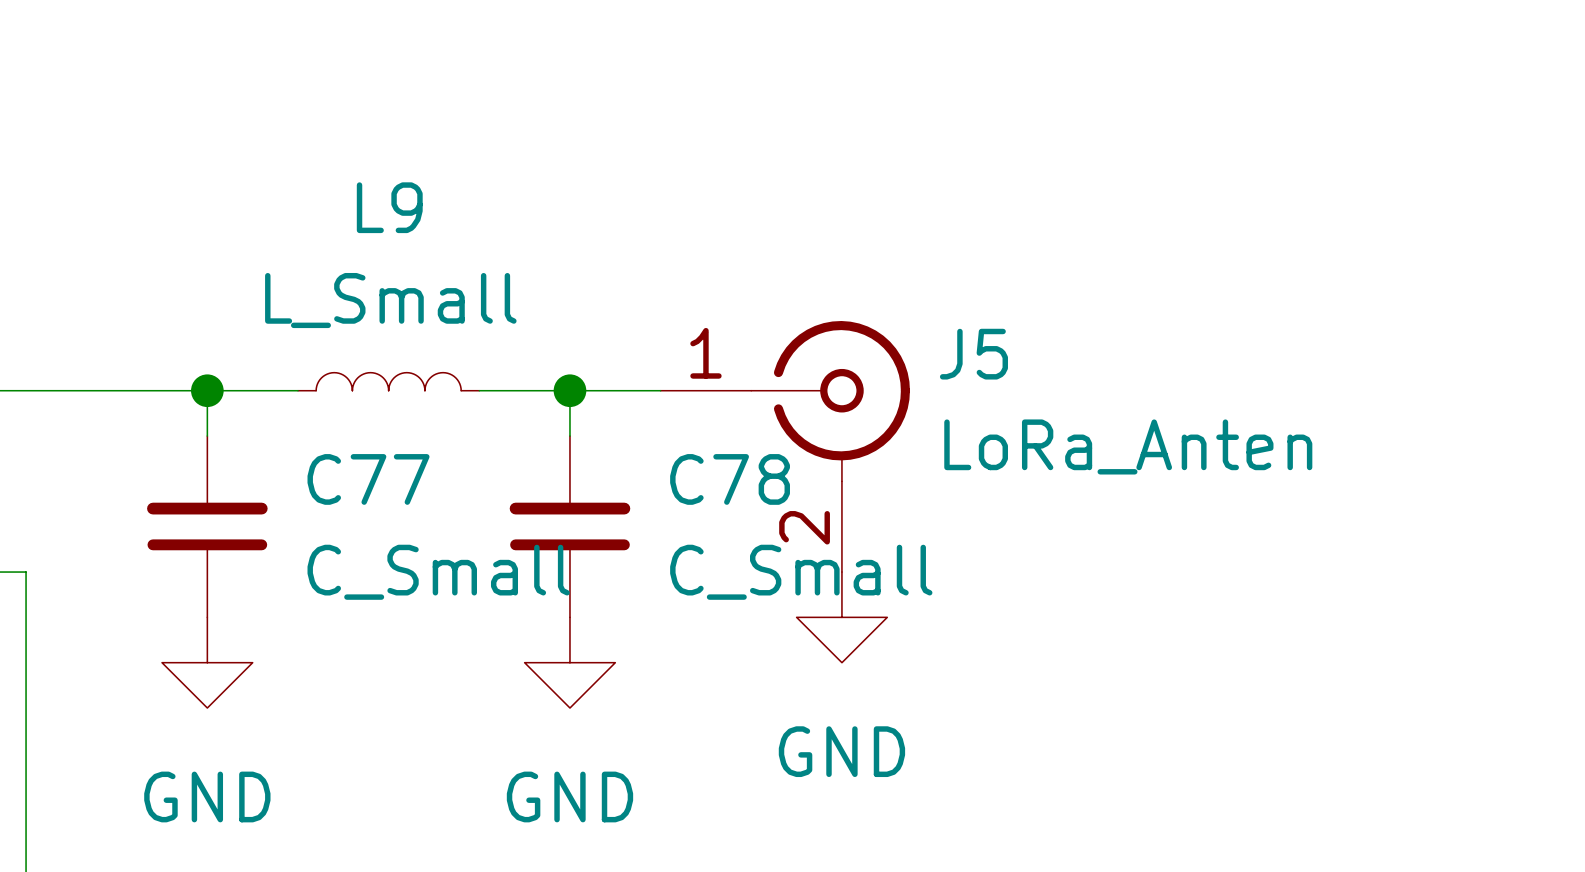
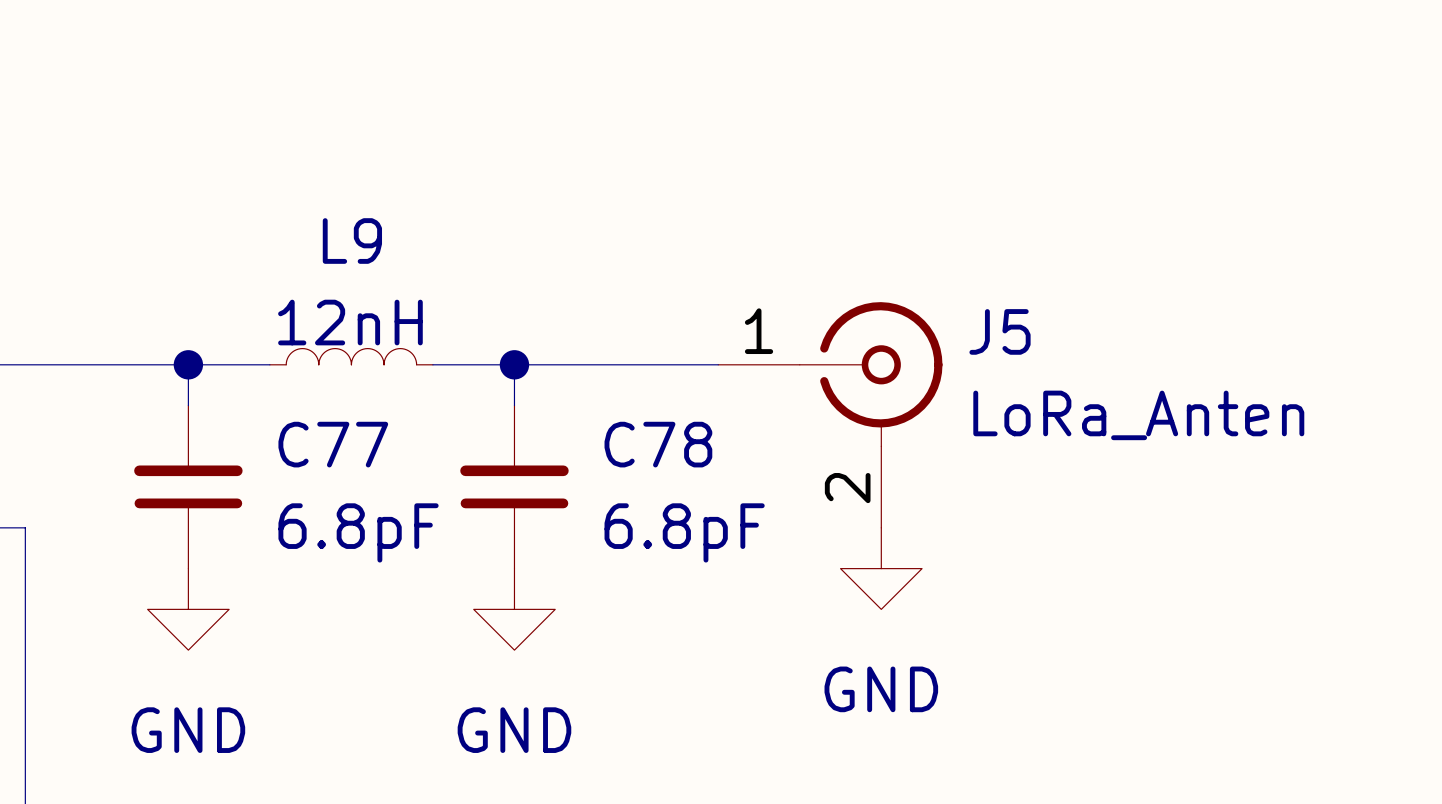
L9 name position: L9 (389, 207) -> L9 (352, 241)
L9 value: L_Small (390, 300) -> 12nH (350, 322)
J5 position: (785, 446) -> (830, 414)
C77 value: C_Small (438, 572) -> 6.8pF (358, 532)
C78 value: C_Small (801, 572) -> 6.8pF (684, 532)
power symbol position: GND (841, 617) -> GND (881, 568)

